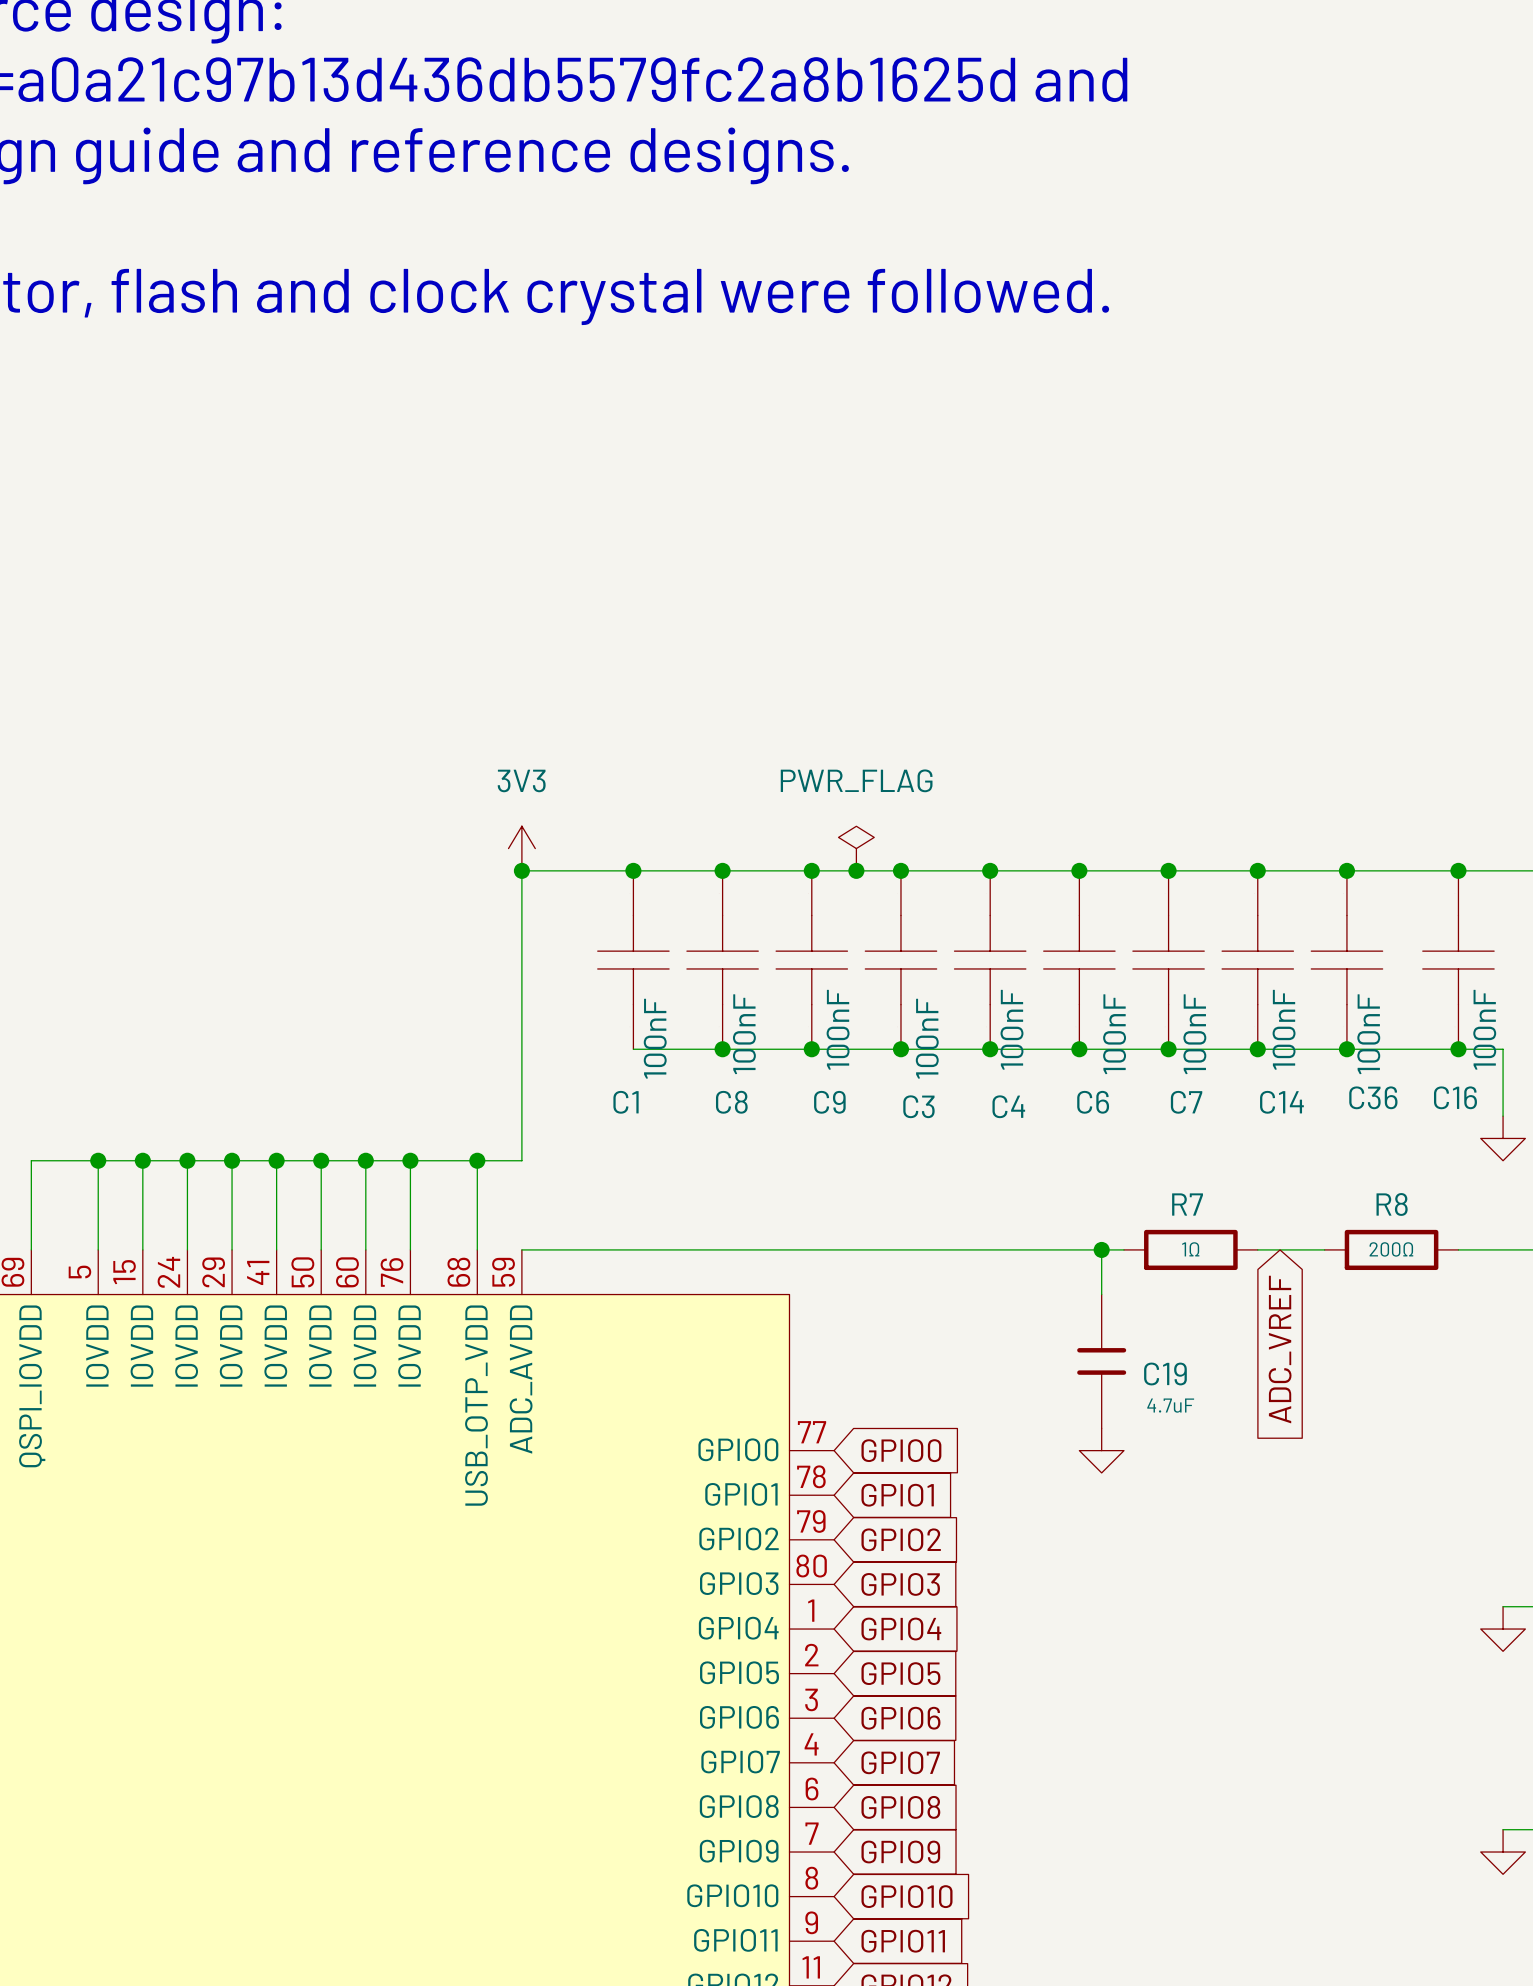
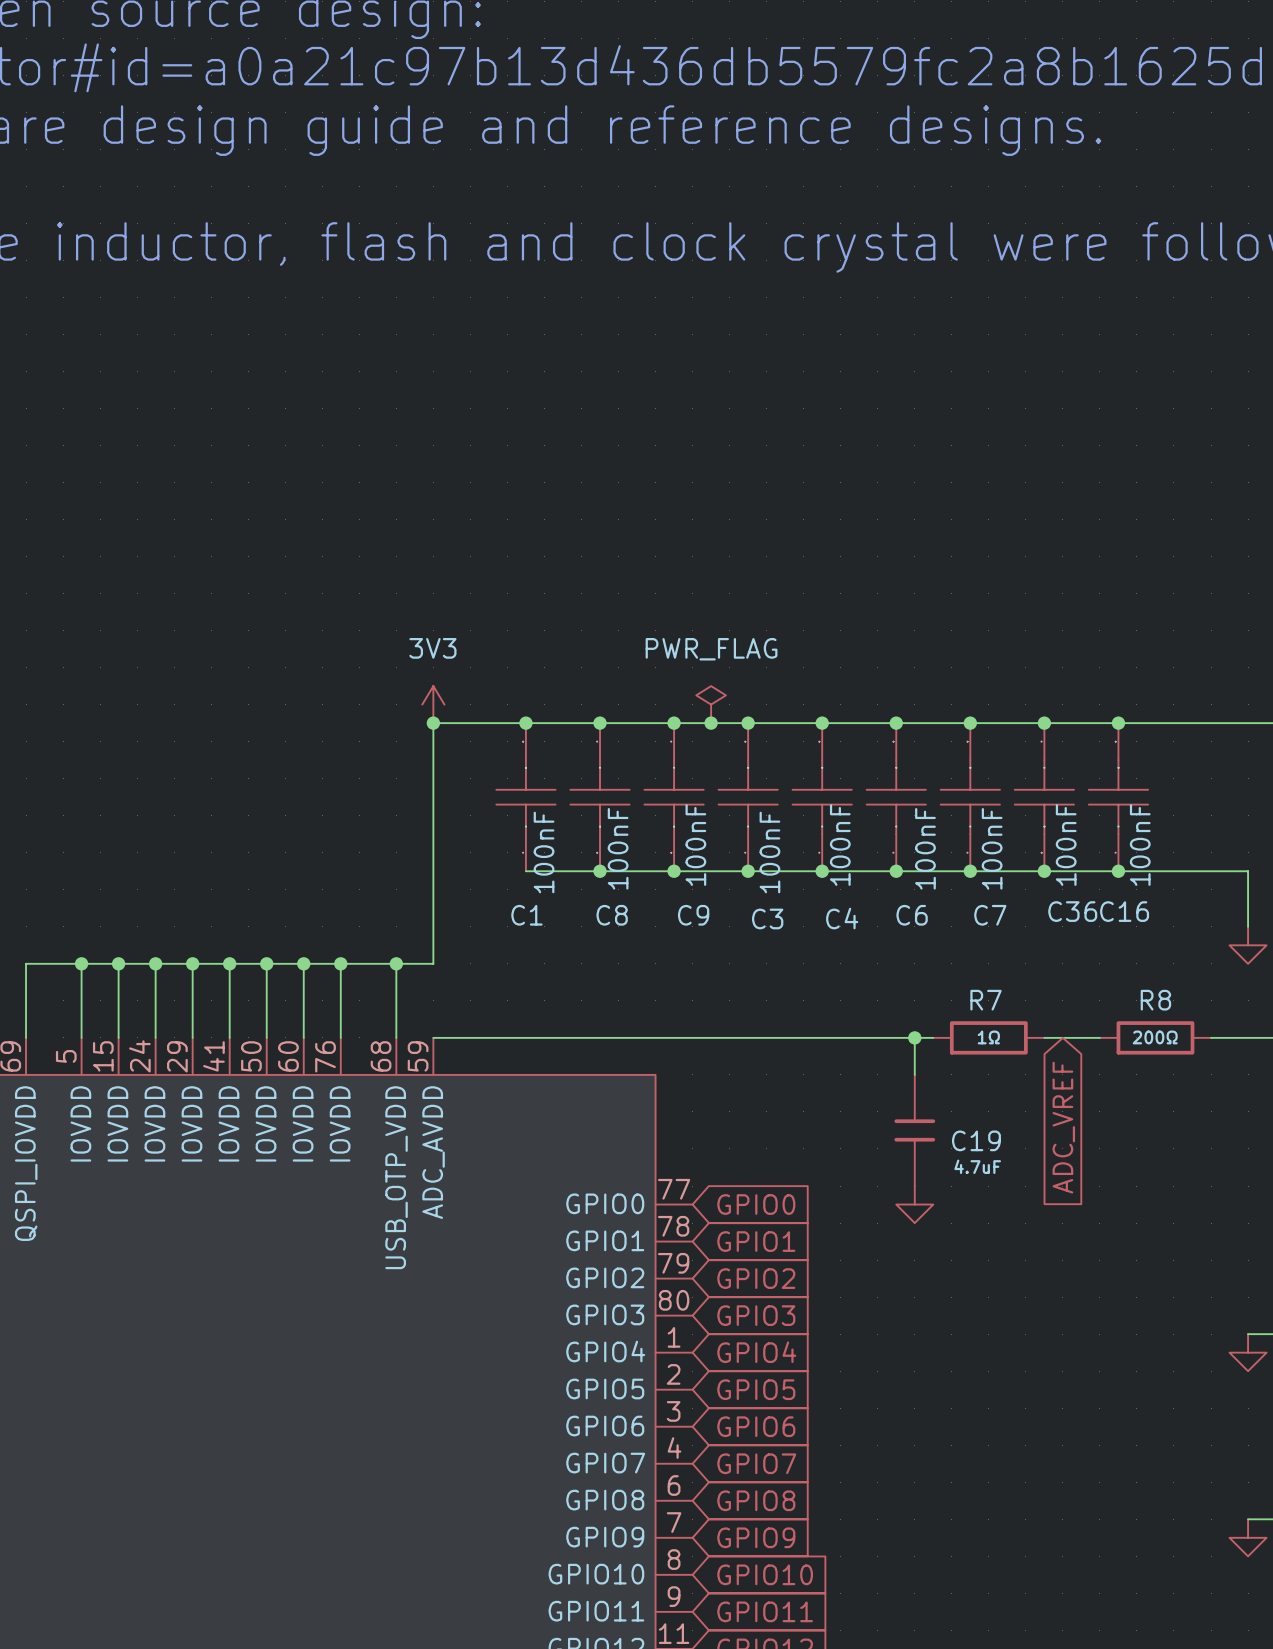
junction: (1458, 870) -> none
C36: 100nF (1346, 960) -> none
C16 position: (1458, 960) -> (1118, 797)
junction: (1458, 1049) -> none
C14 name: C14 (1281, 1102) -> C36 (1072, 911)

